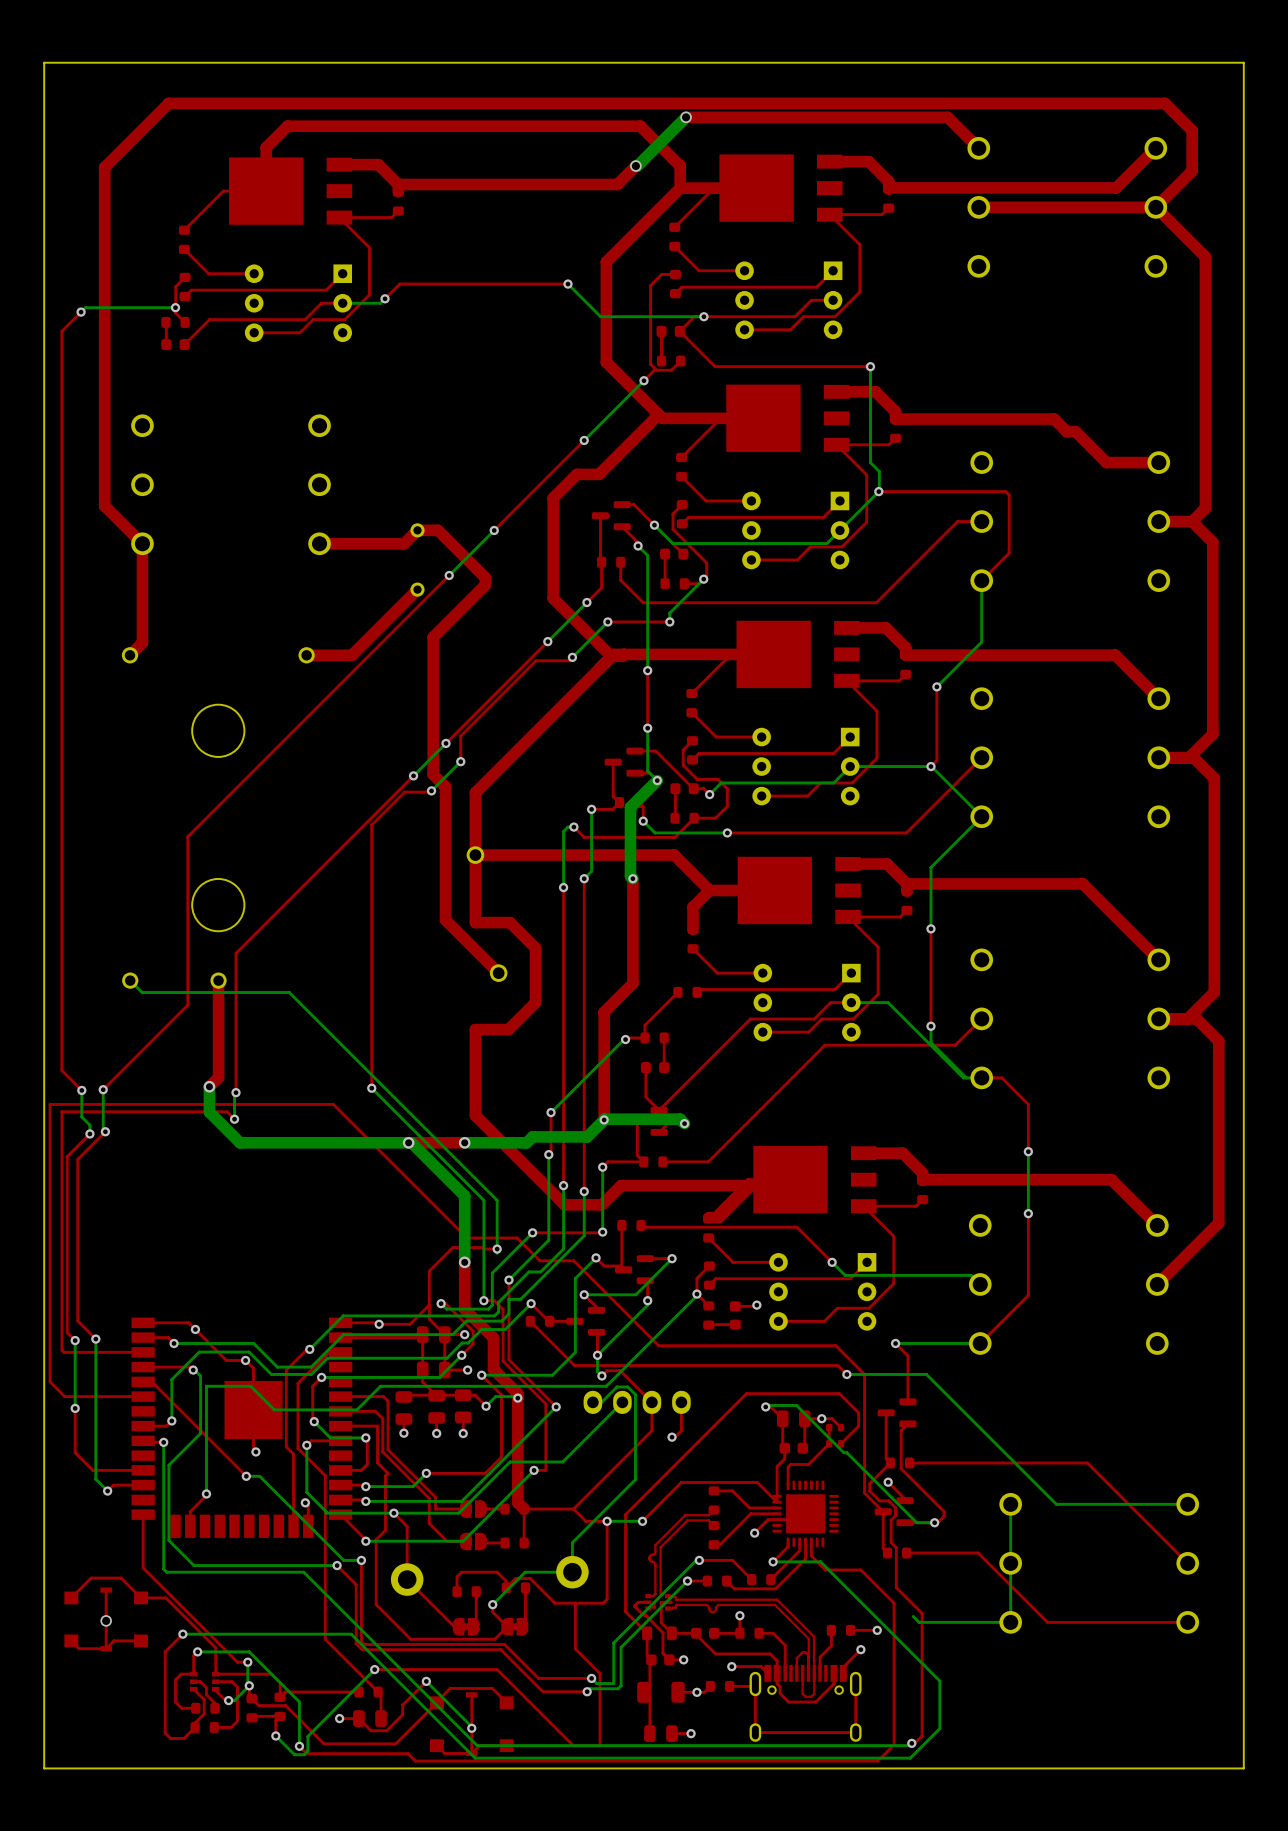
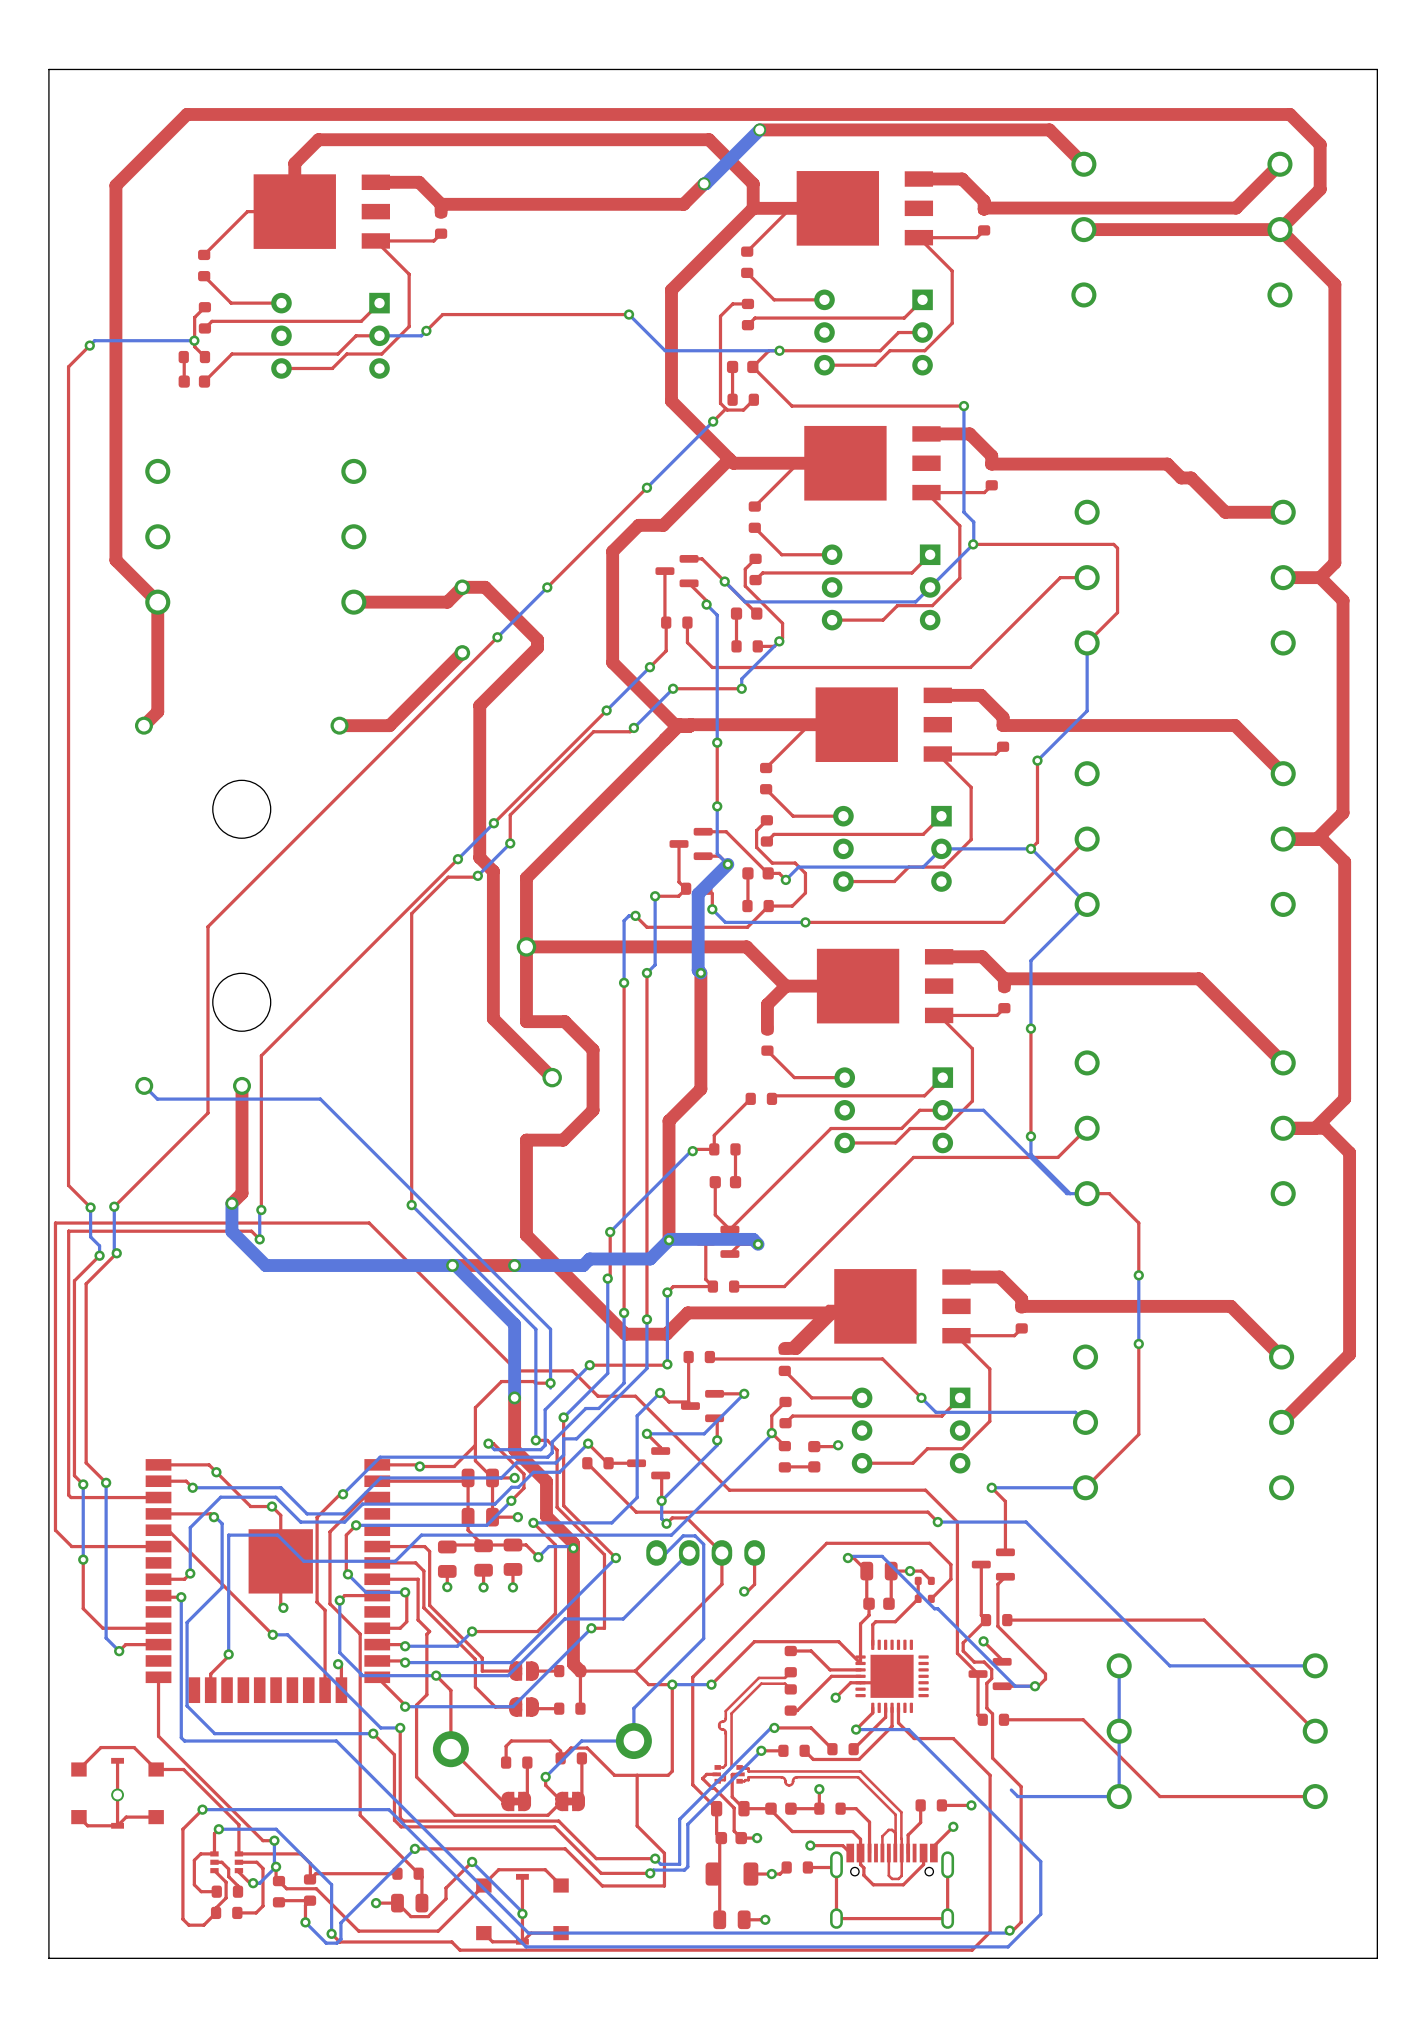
top track: (497, 1669) (573, 1745) (600, 1745) (600, 1703) -> (550, 1848) (565, 1848) (602, 1885) (664, 1885)

